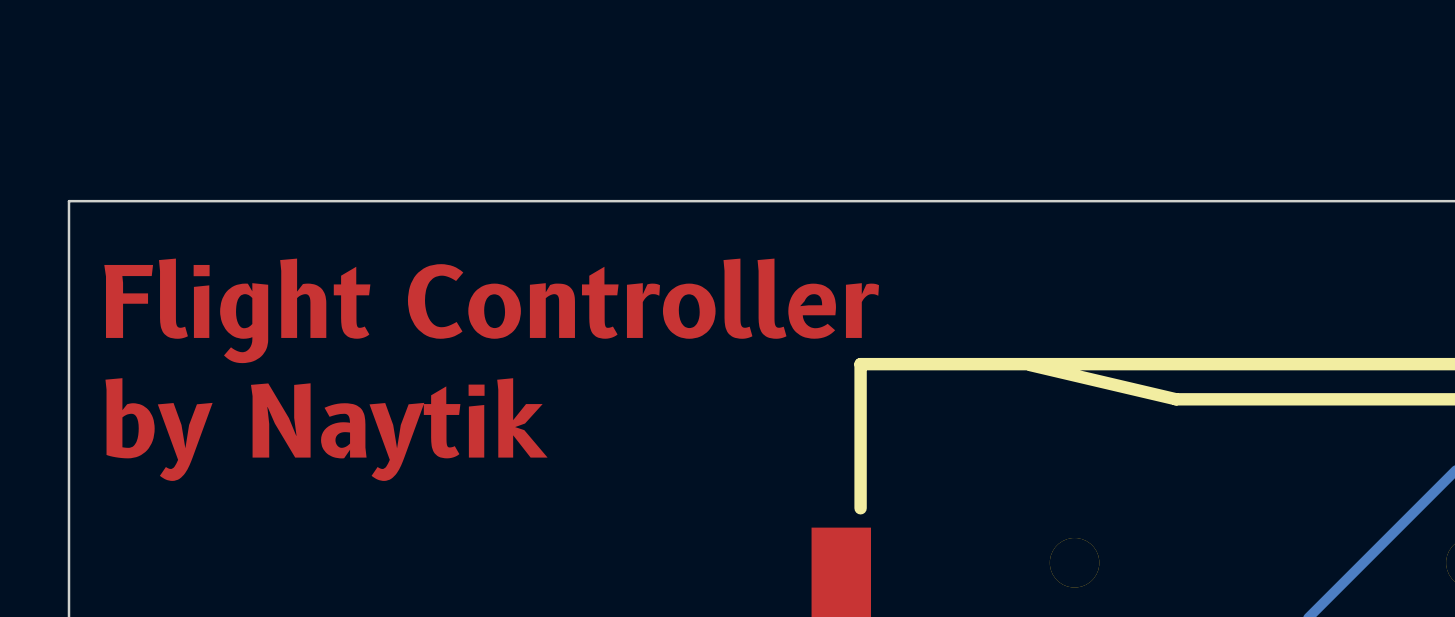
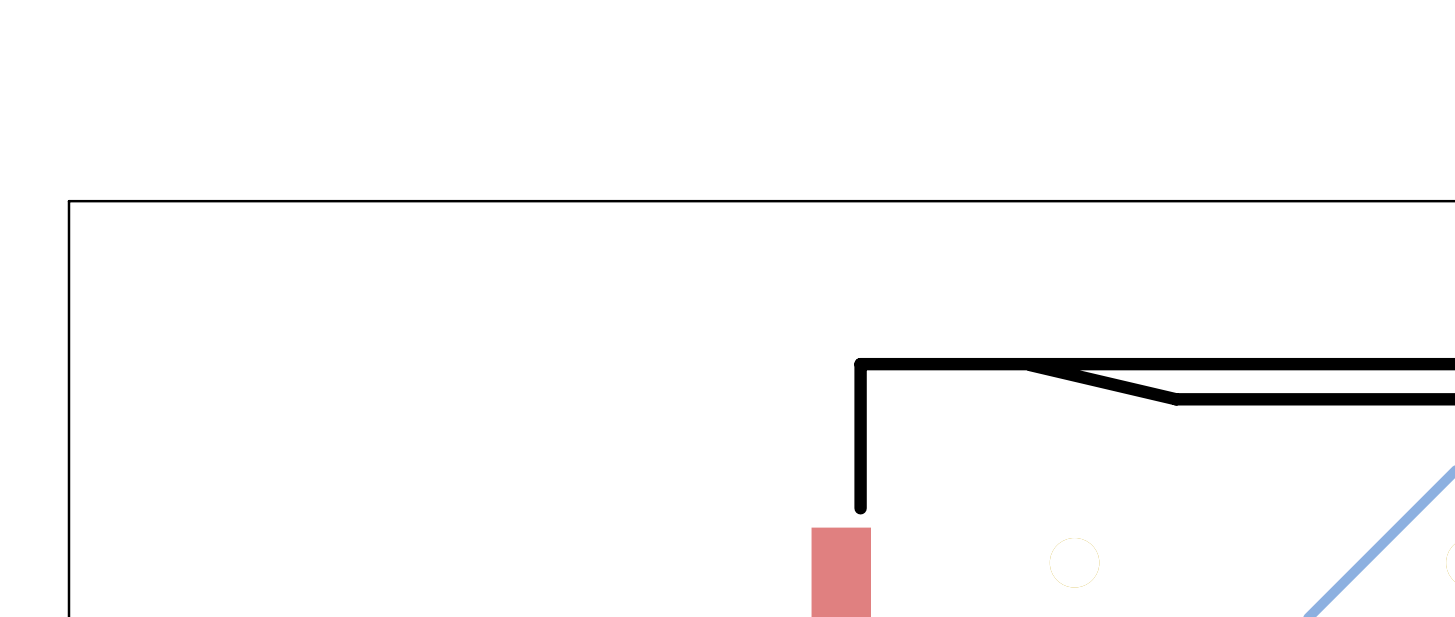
text: Flight Controller (491, 310) -> none
text: by Naytik (326, 429) -> none

